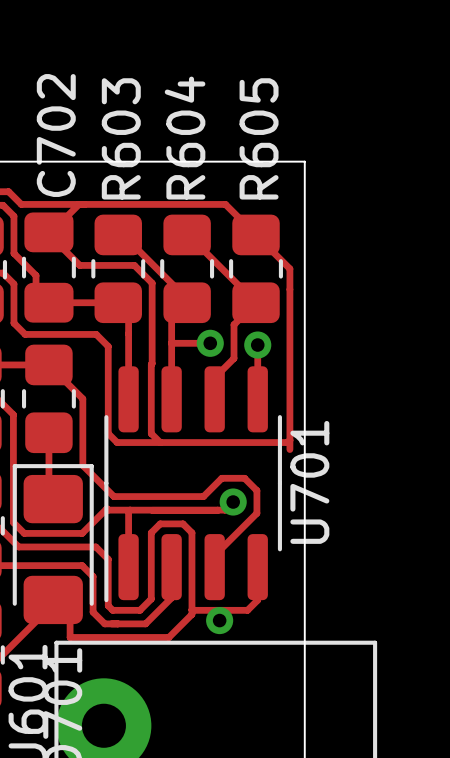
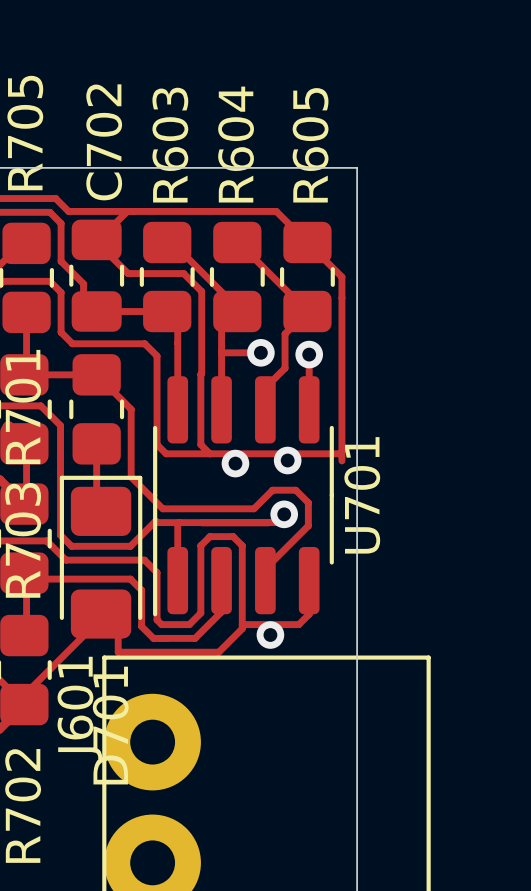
via: none -> (287, 460)
via: none -> (235, 463)

